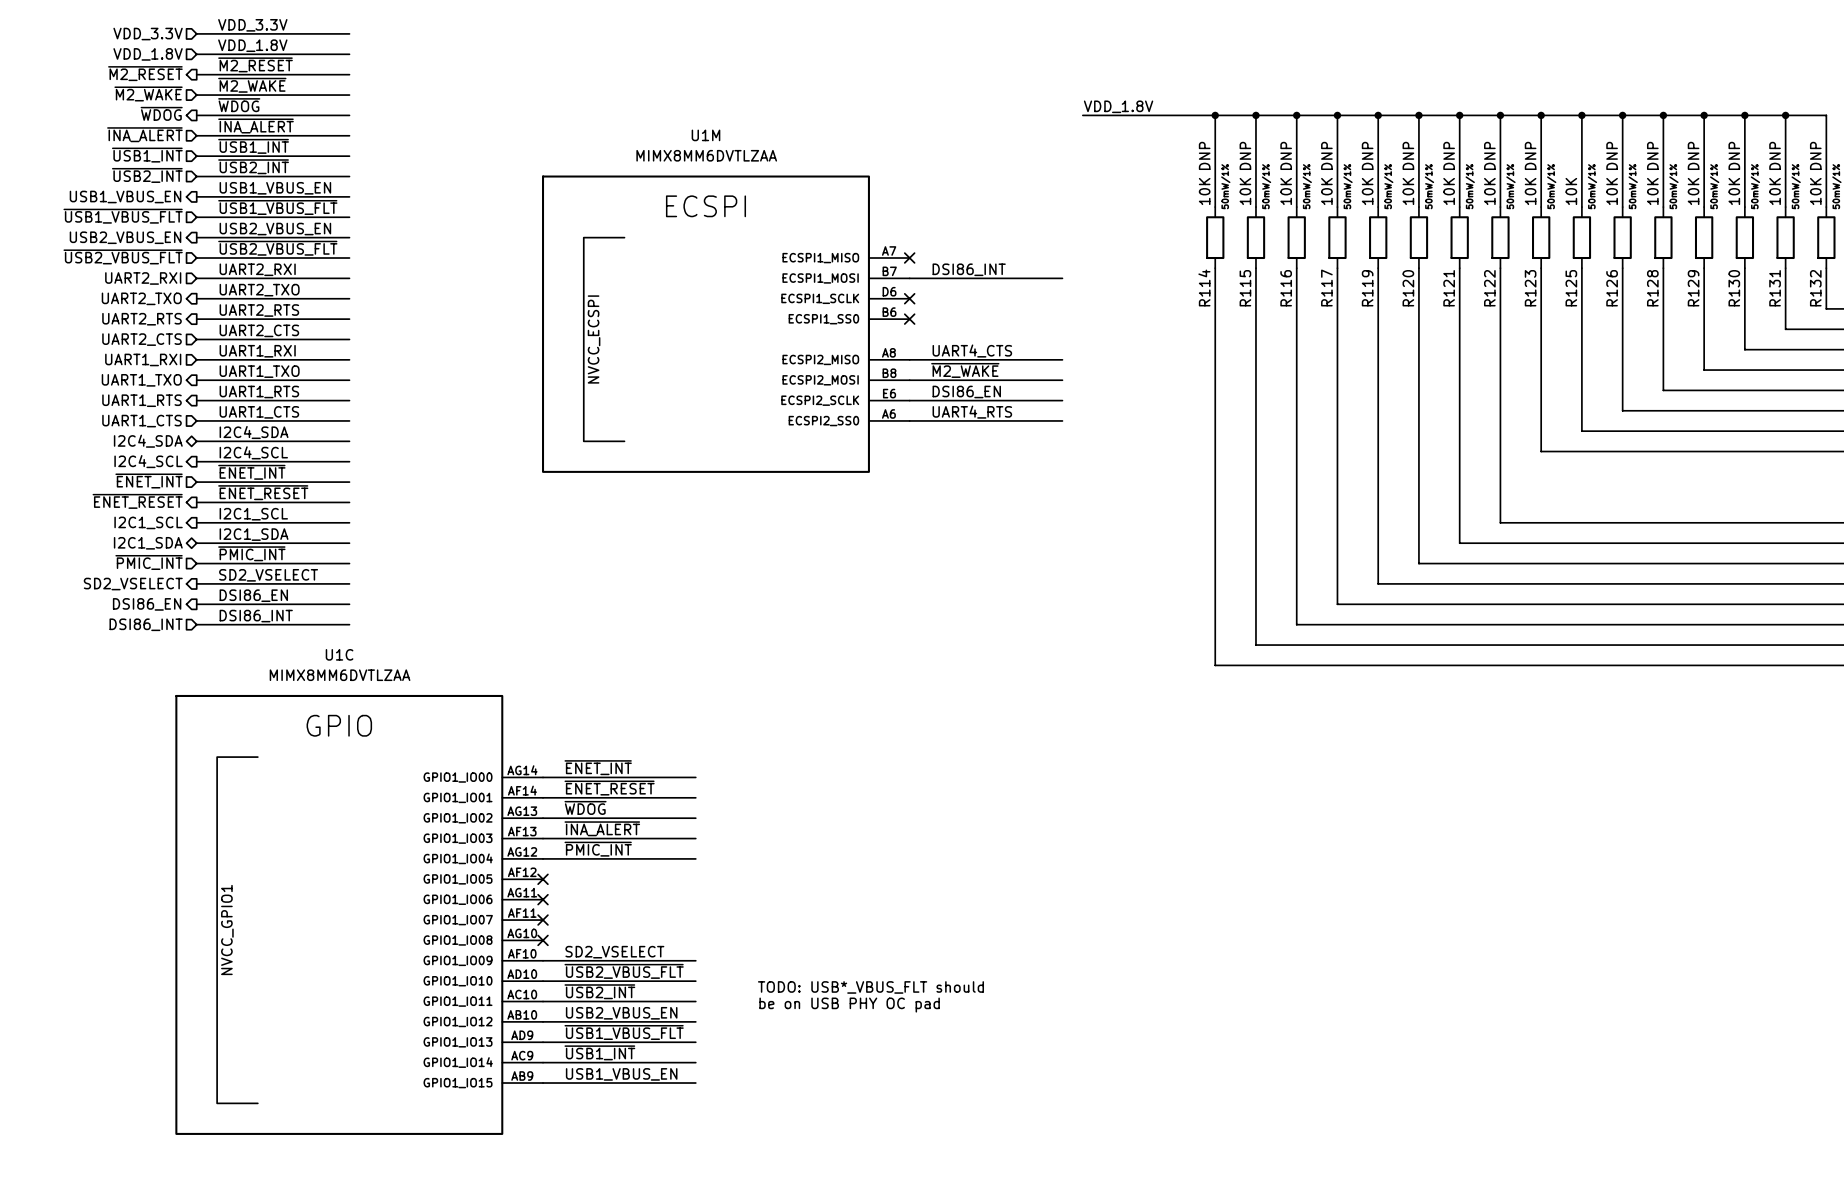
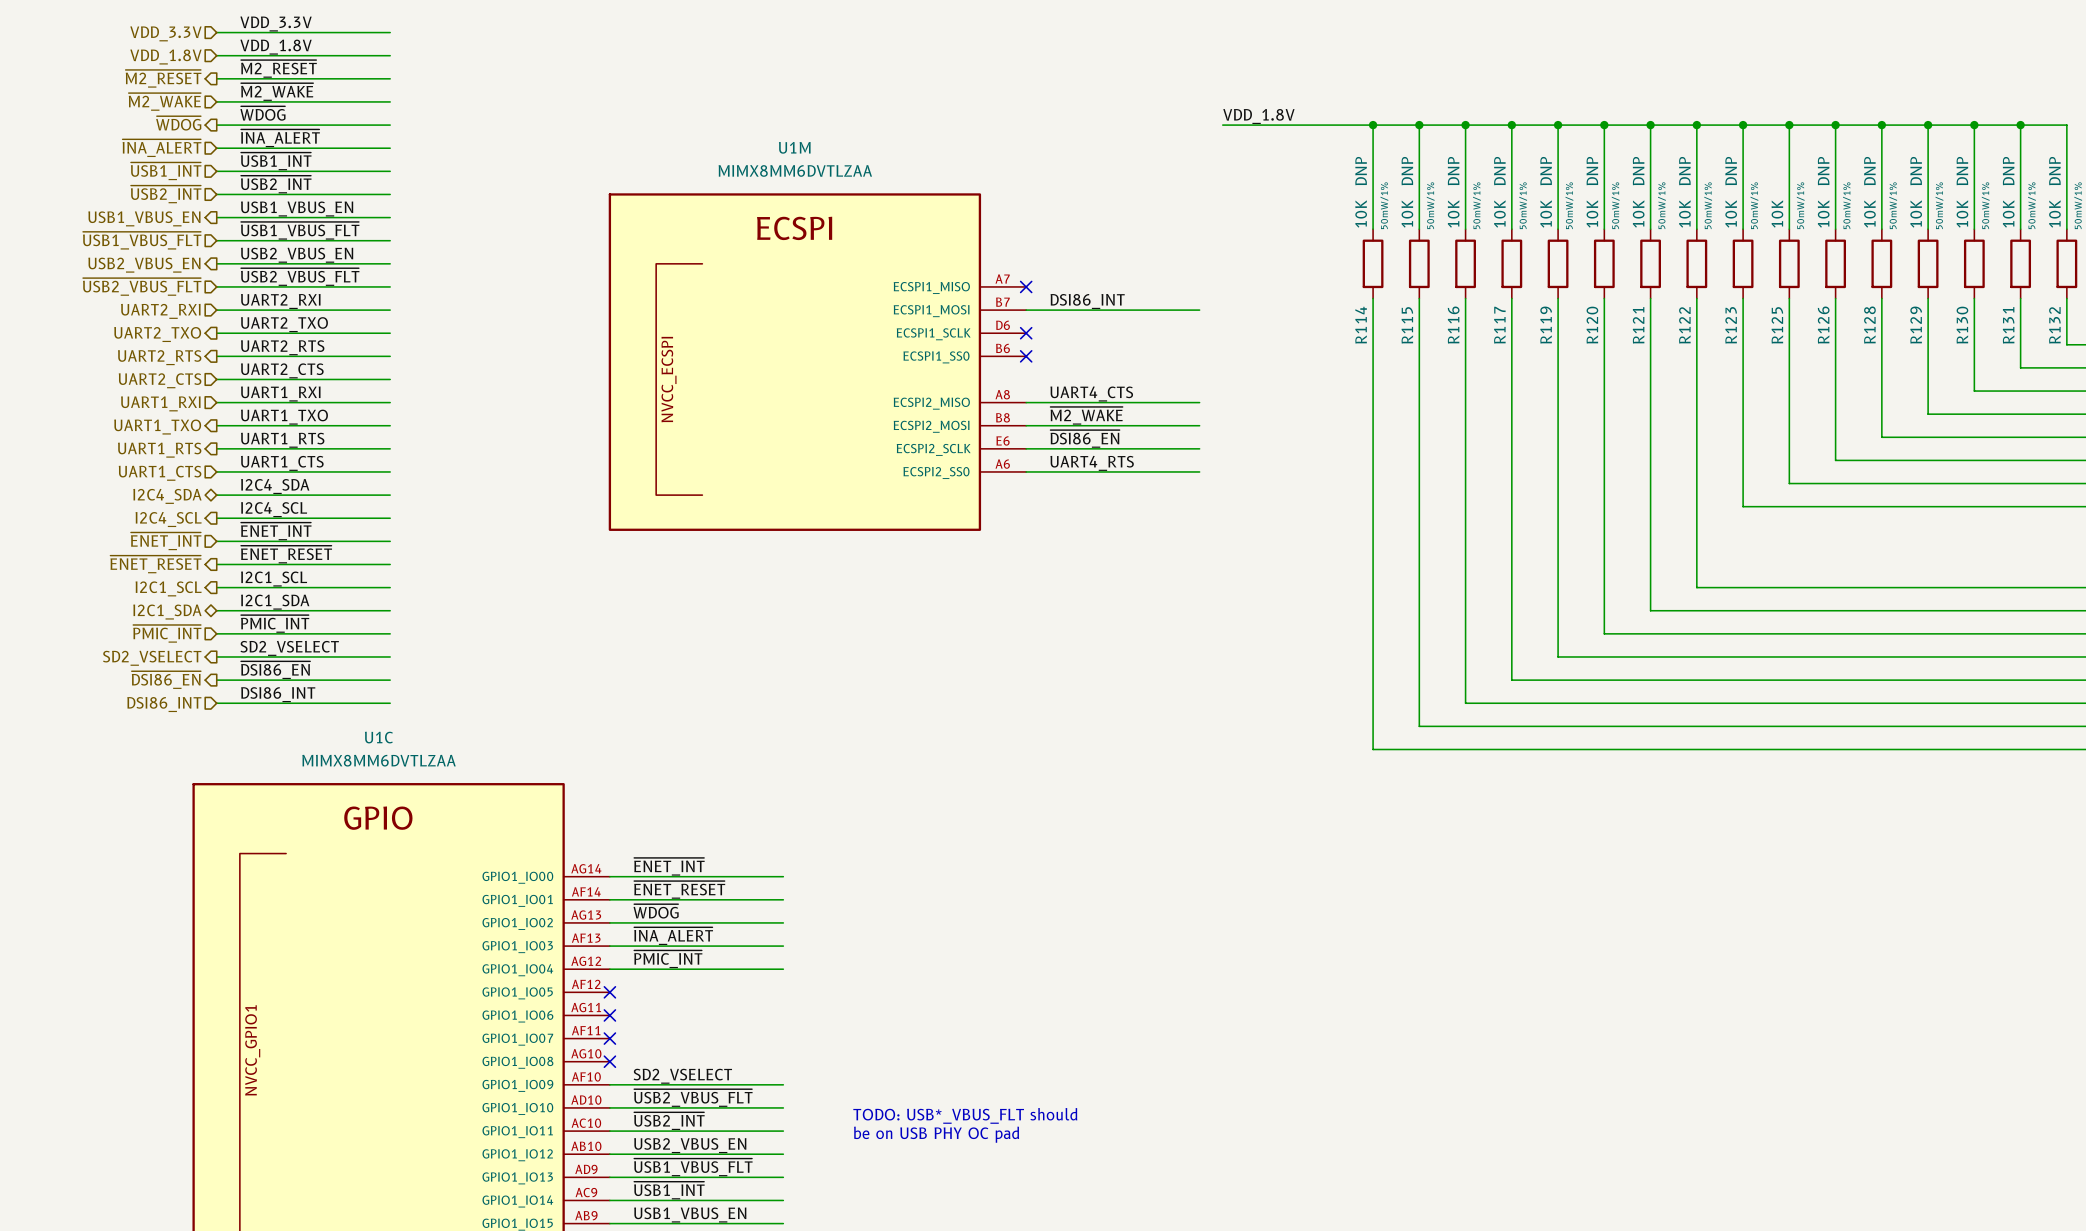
label: DSI86_EN (966, 391) -> ~{DSI86_EN} (1085, 438)
label: DSI86_EN (253, 595) -> ~{DSI86_EN} (275, 670)
hierarchical label: DSI86_EN (147, 604) -> ~{DSI86_EN} (166, 680)

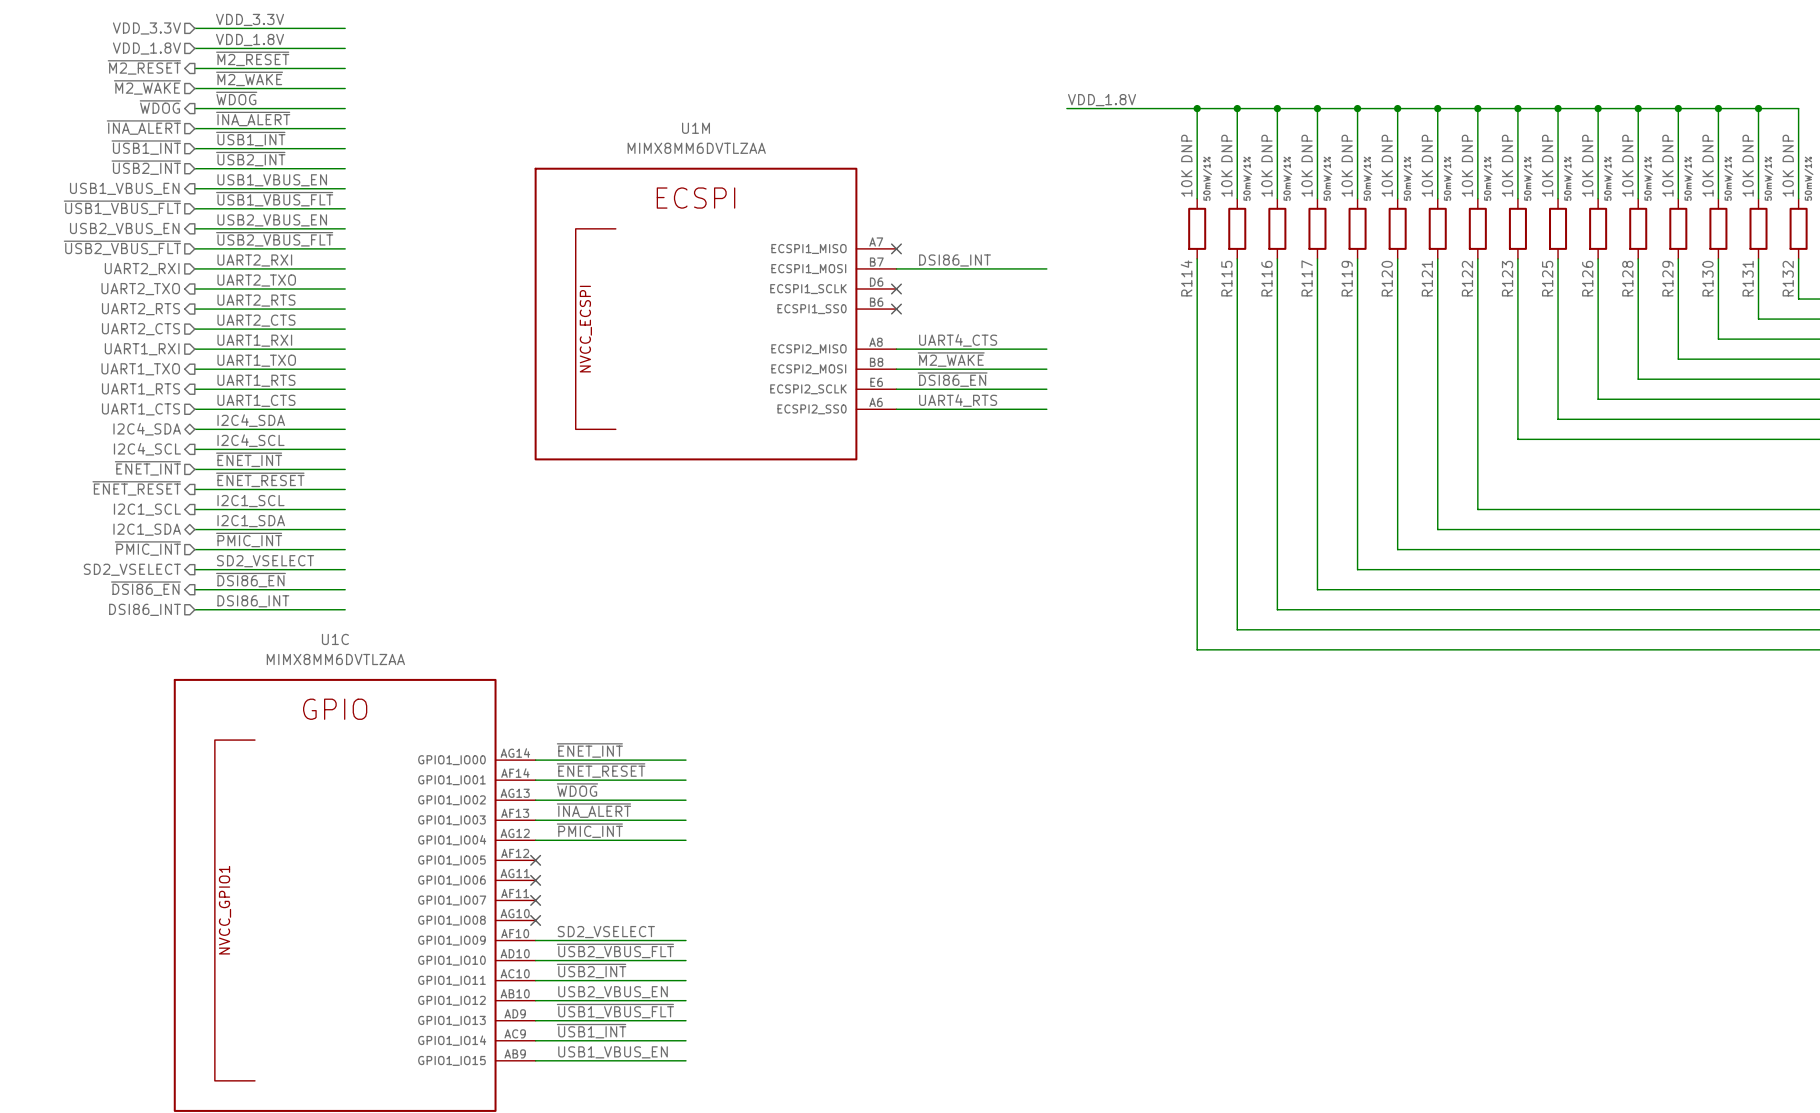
R125 text: none -> DNP (1547, 148)
text: TODO: USB*_VBUS_FLT should (965, 1115) -> none
text: be on USB PHY OC pad (936, 1134) -> none

